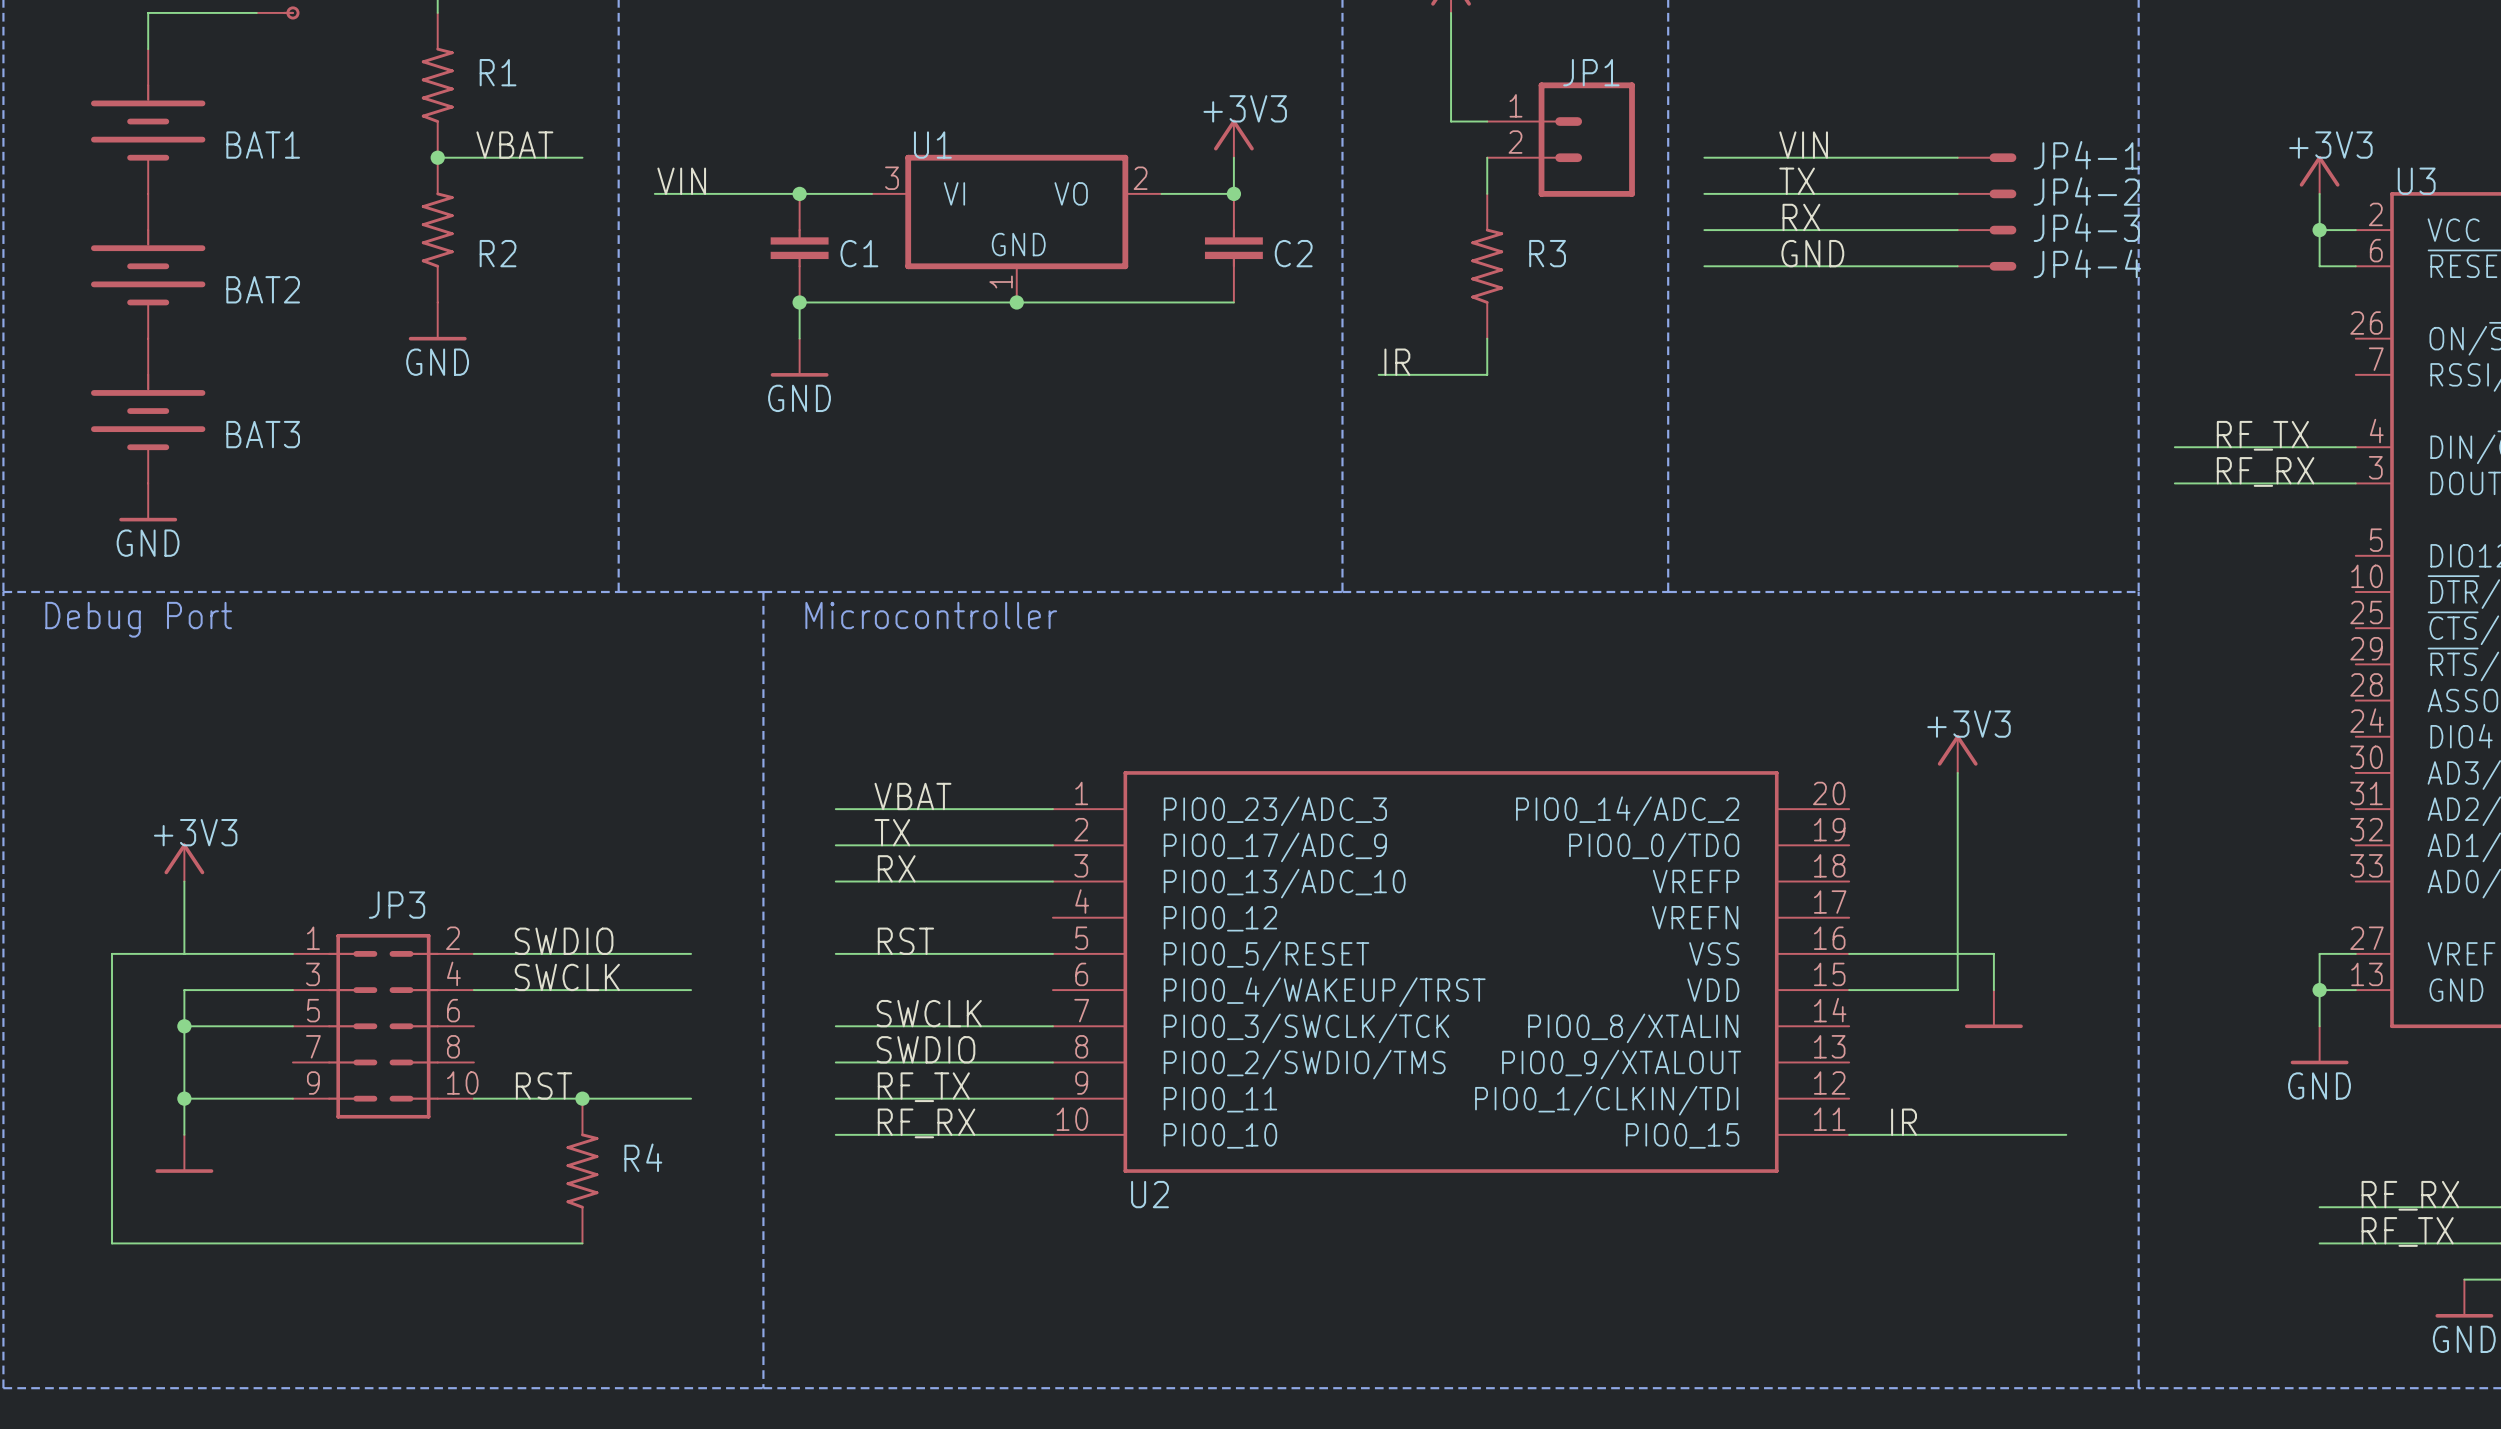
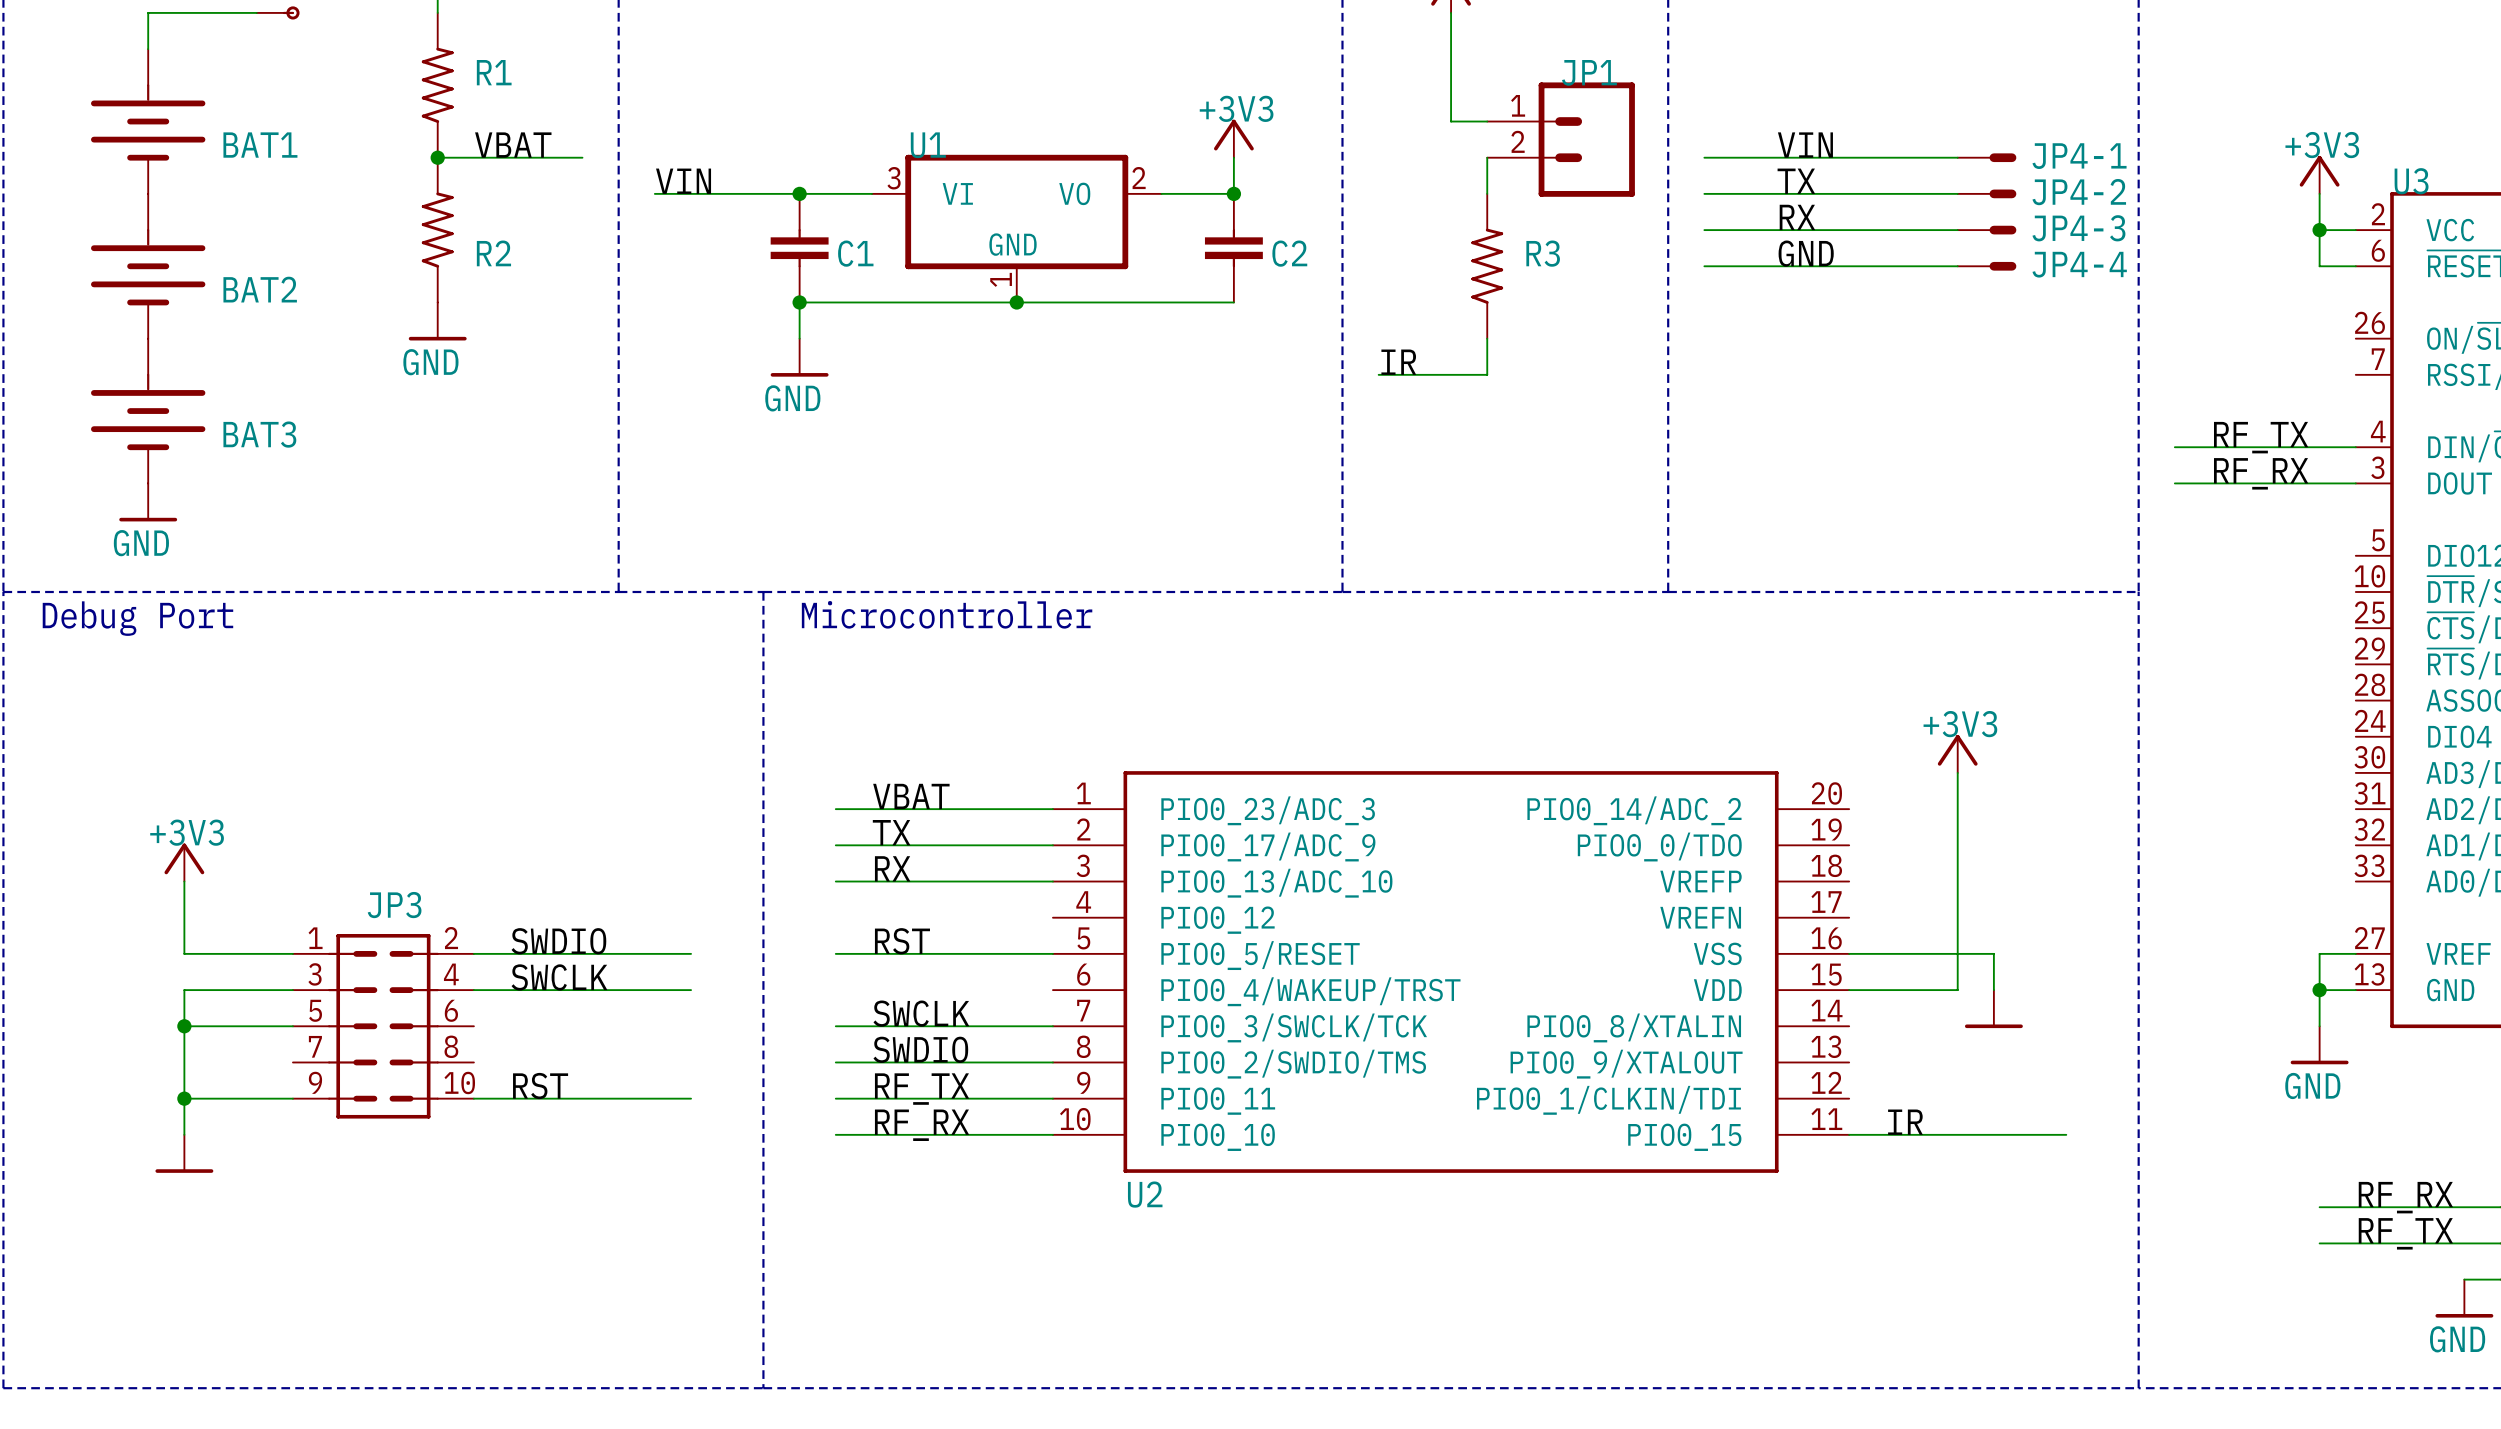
wire: (184, 953) (112, 953) (112, 1243) (582, 1243) -> none
junction: (582, 1098) -> none
R4: (582, 1171) -> none

